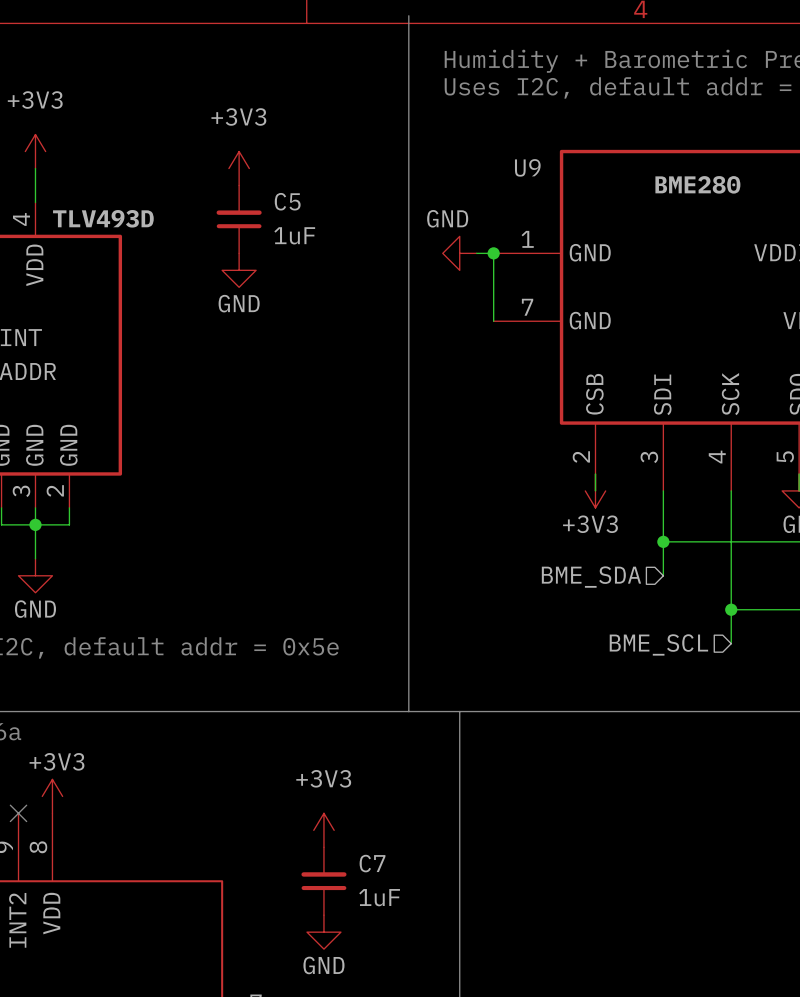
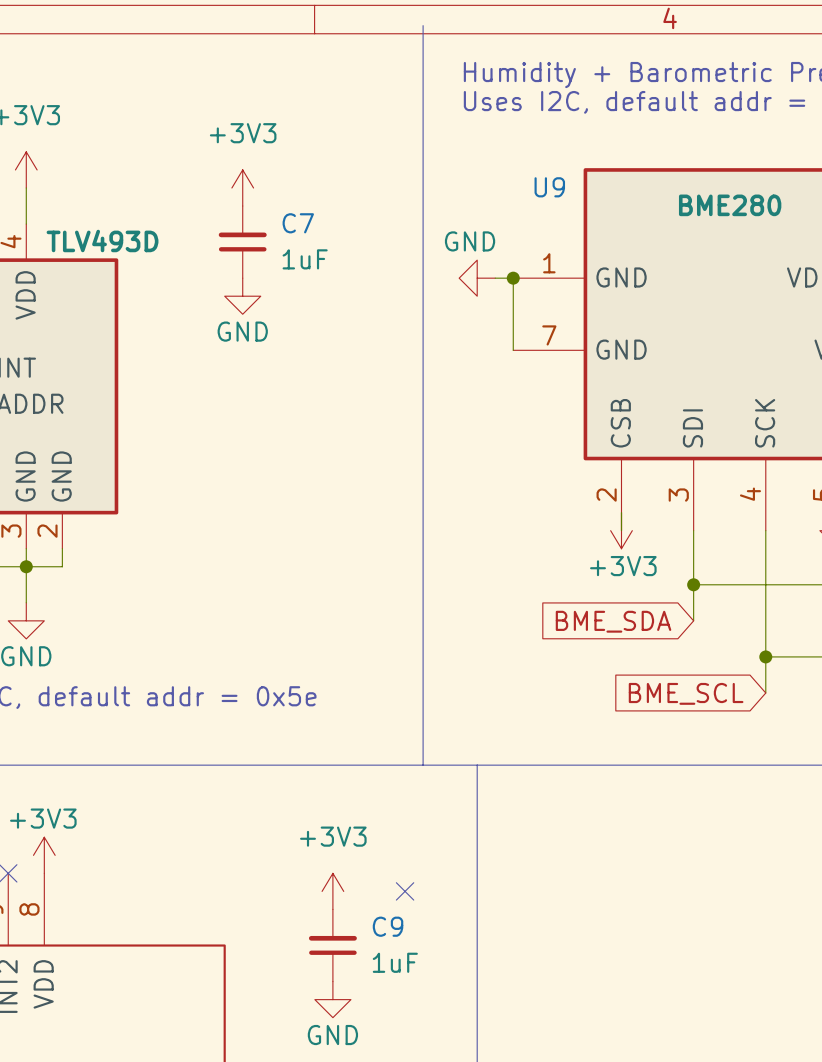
C5 name: C5 (287, 201) -> C7 (298, 223)
hierarchical label: BME_SDA (591, 577) -> none
global label: none -> BME_SDA (613, 621)
hierarchical label: BME_SCL (658, 644) -> none
global label: none -> BME_SCL (686, 693)
no-connect mark: none -> (405, 891)
C7 name: C7 (372, 863) -> C9 (388, 926)

